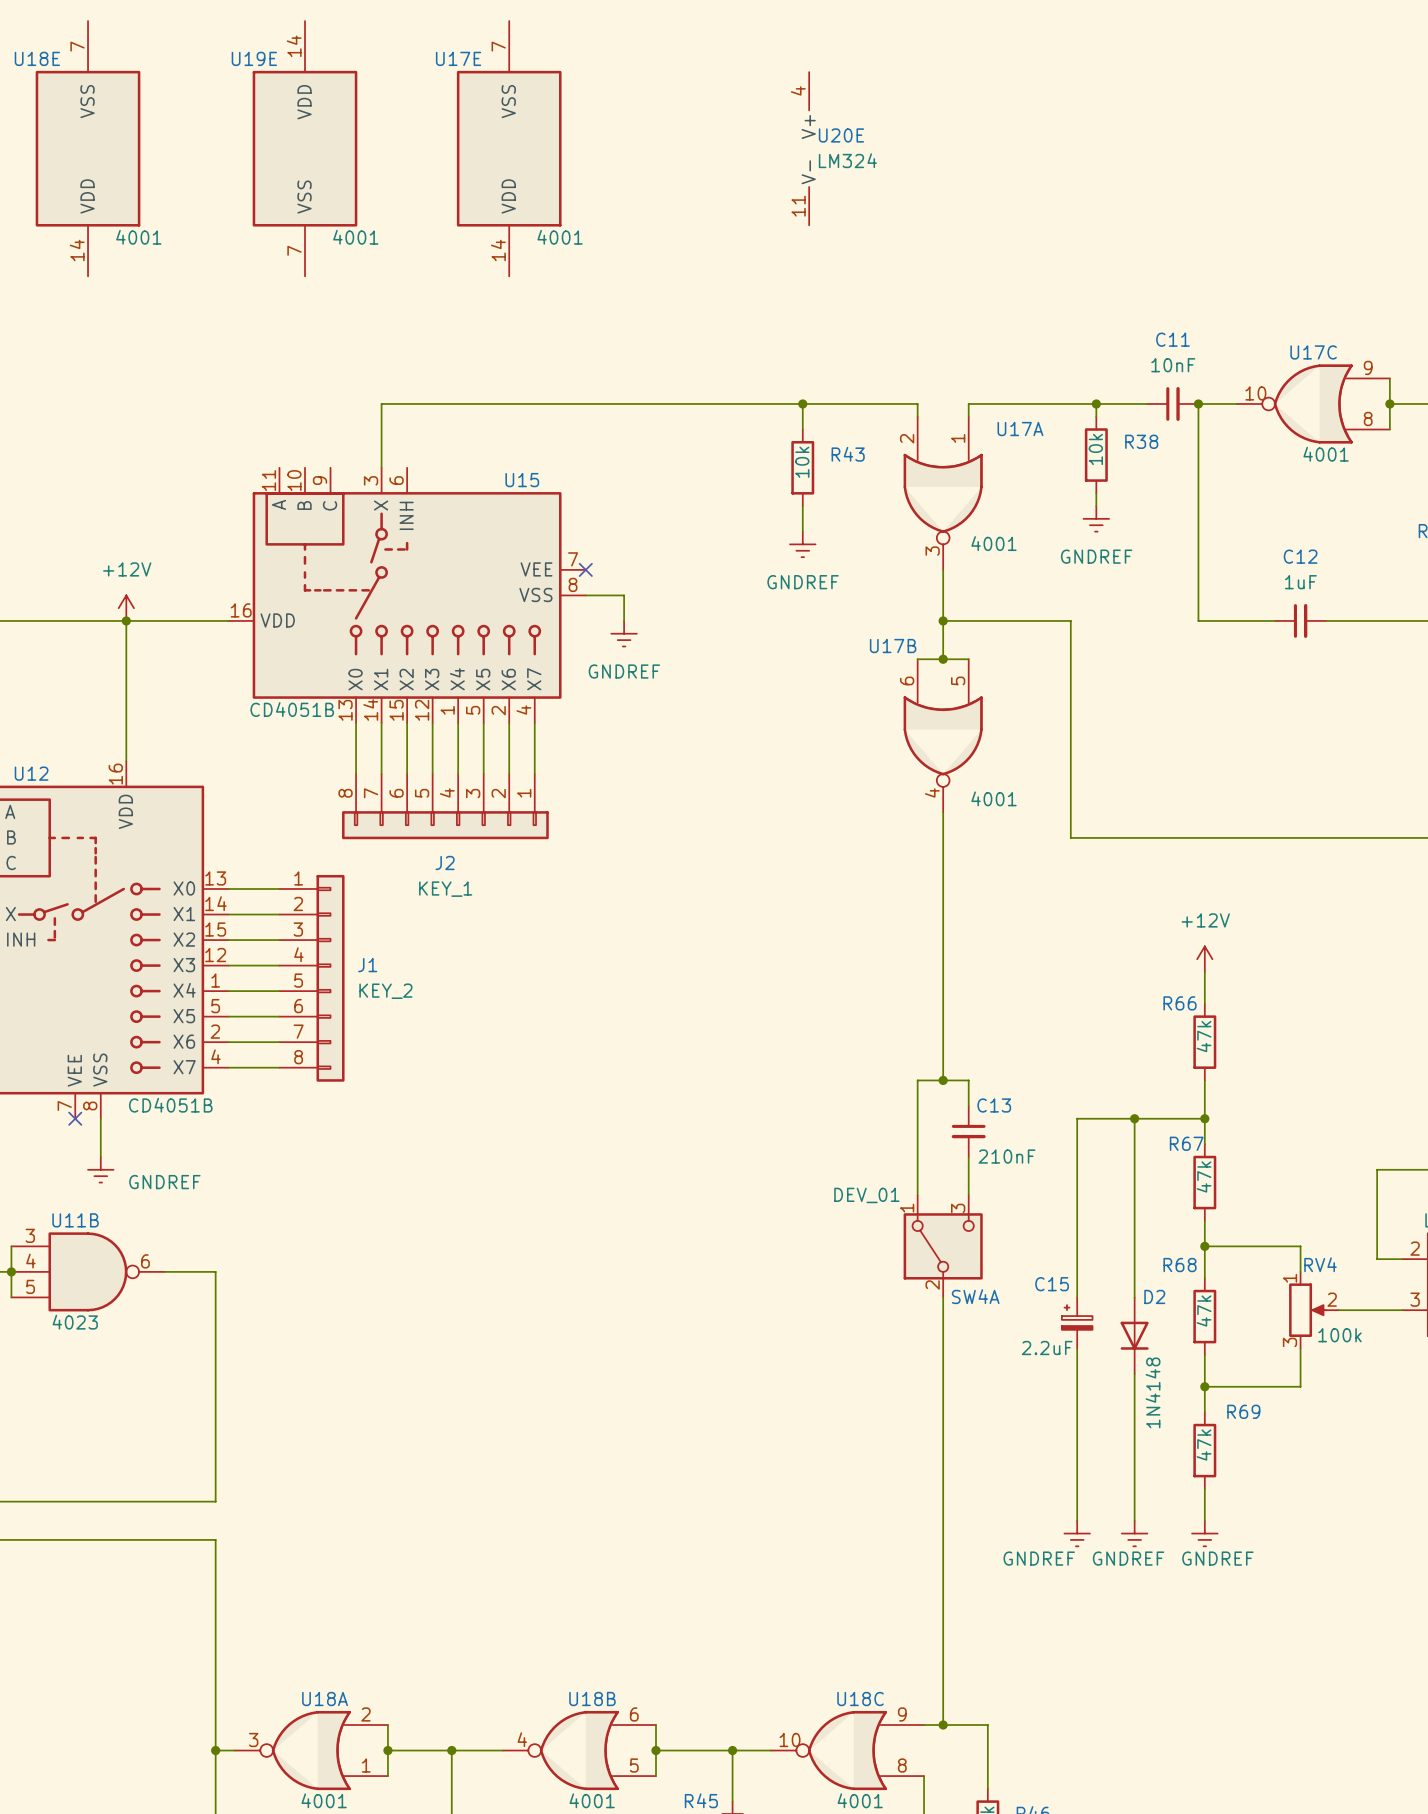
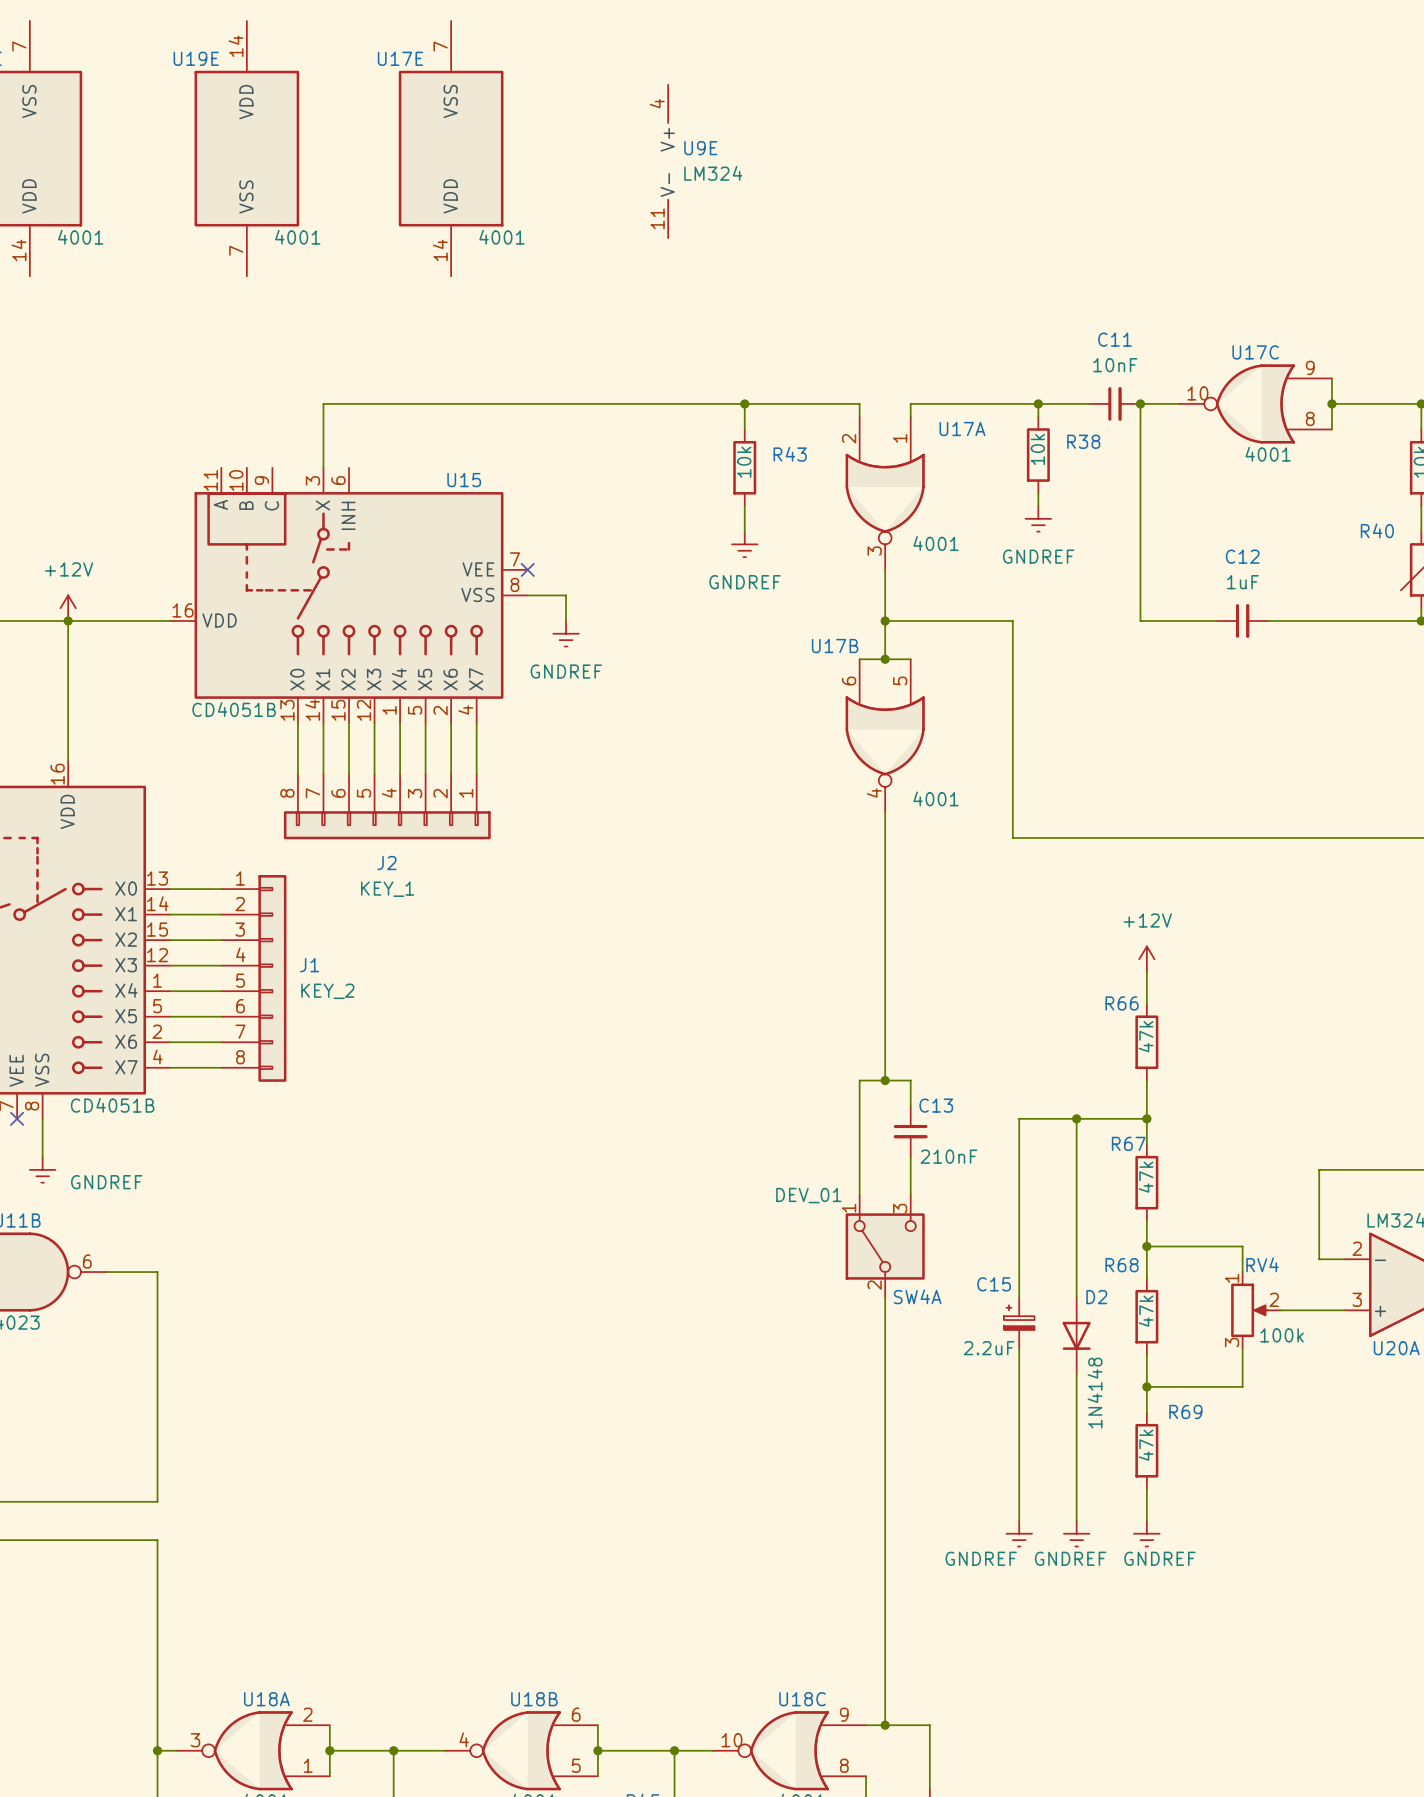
U20E: LM324 (809, 148) -> none
U9E: none -> LM324 (668, 161)

